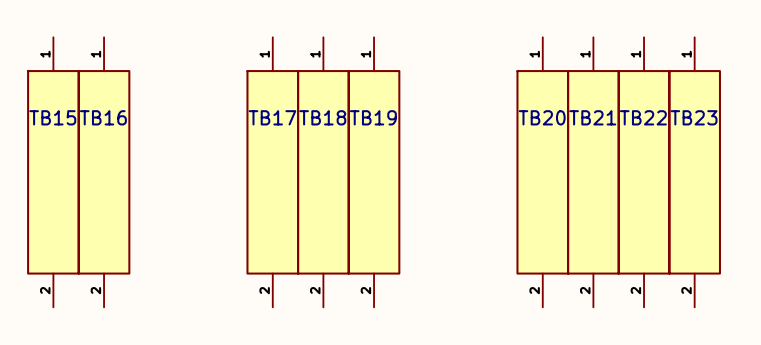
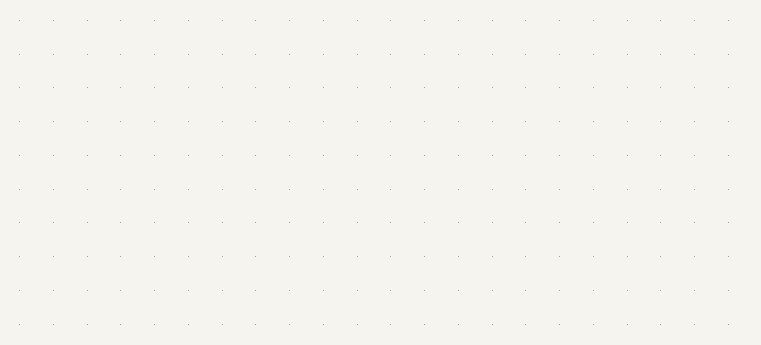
TB15: (53, 172) -> none
TB16: (104, 172) -> none
TB17: (272, 172) -> none
TB18: (323, 172) -> none
TB19: (374, 172) -> none
TB20: (542, 172) -> none
TB21: (593, 172) -> none
TB22: (644, 172) -> none
TB23: (694, 172) -> none

